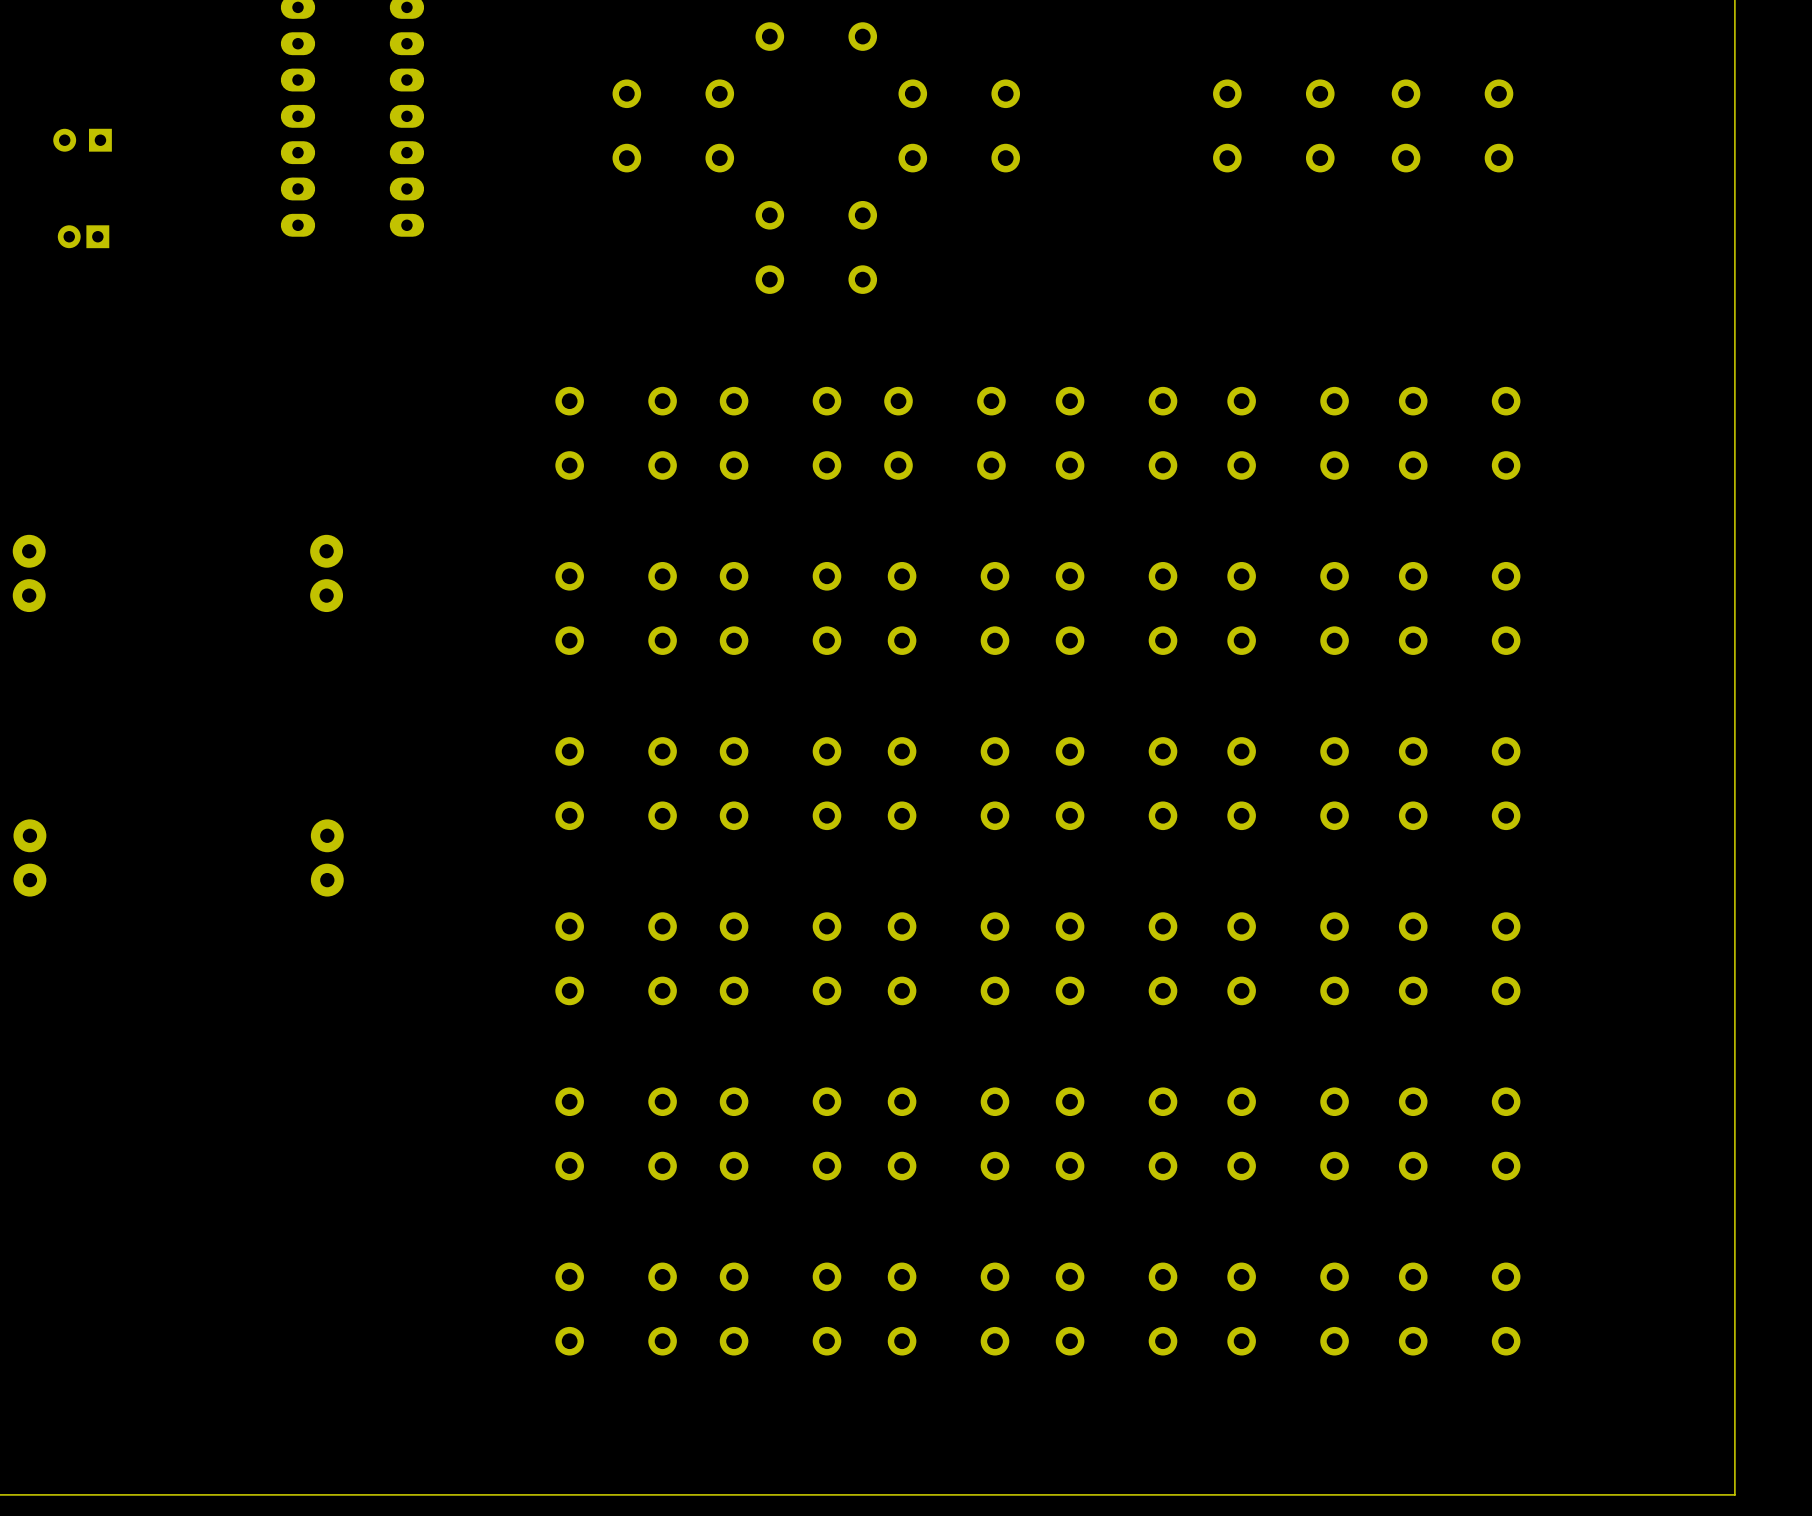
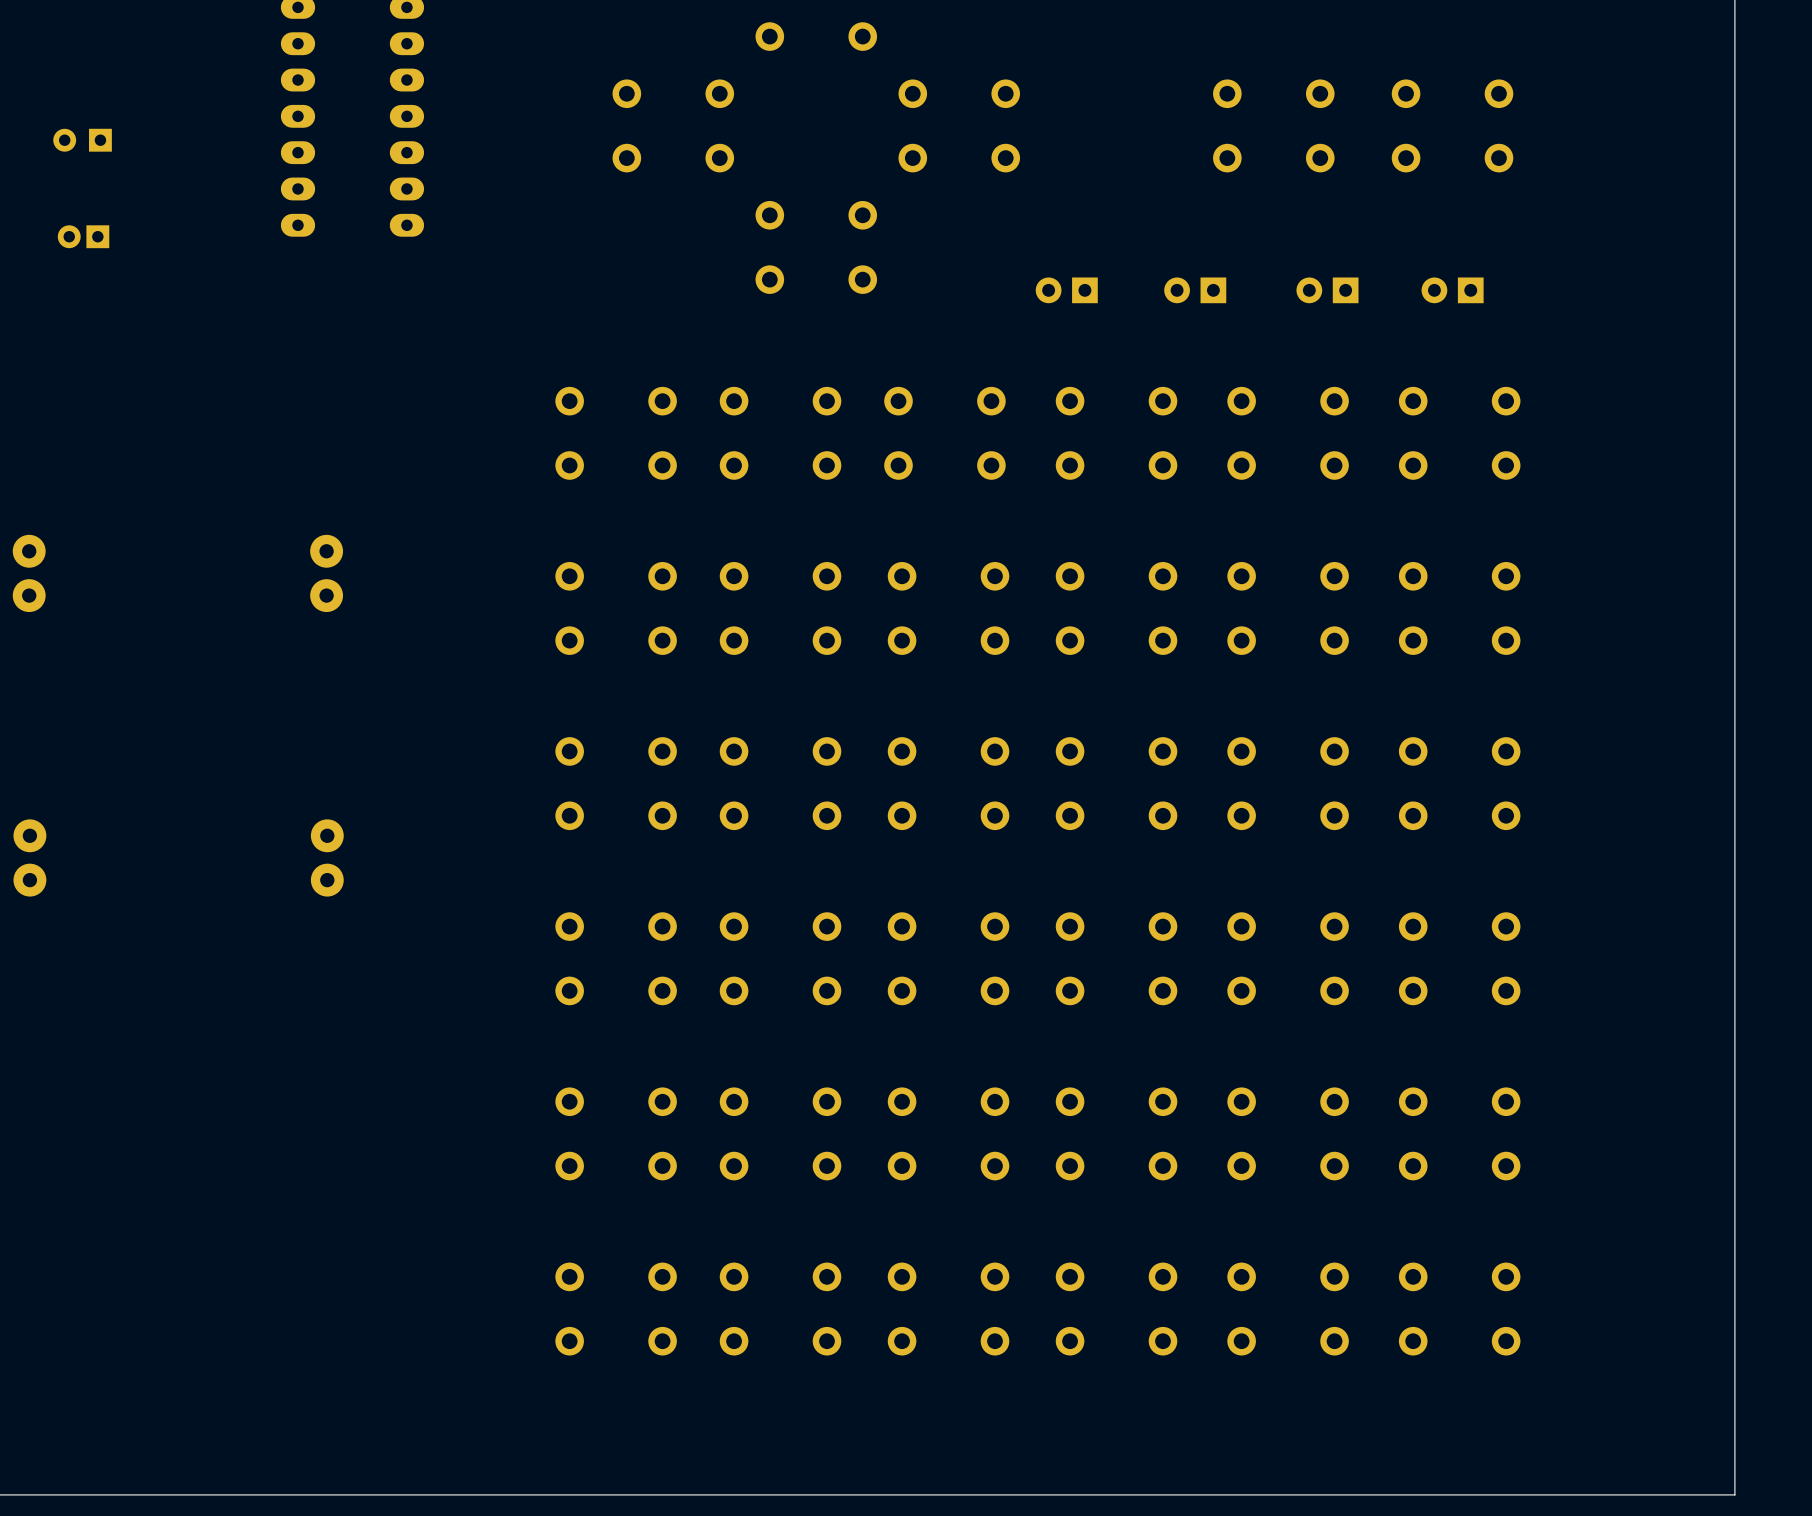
part: none -> (1066, 290)
part: none -> (1195, 290)
part: none -> (1327, 290)
part: none -> (1452, 290)

